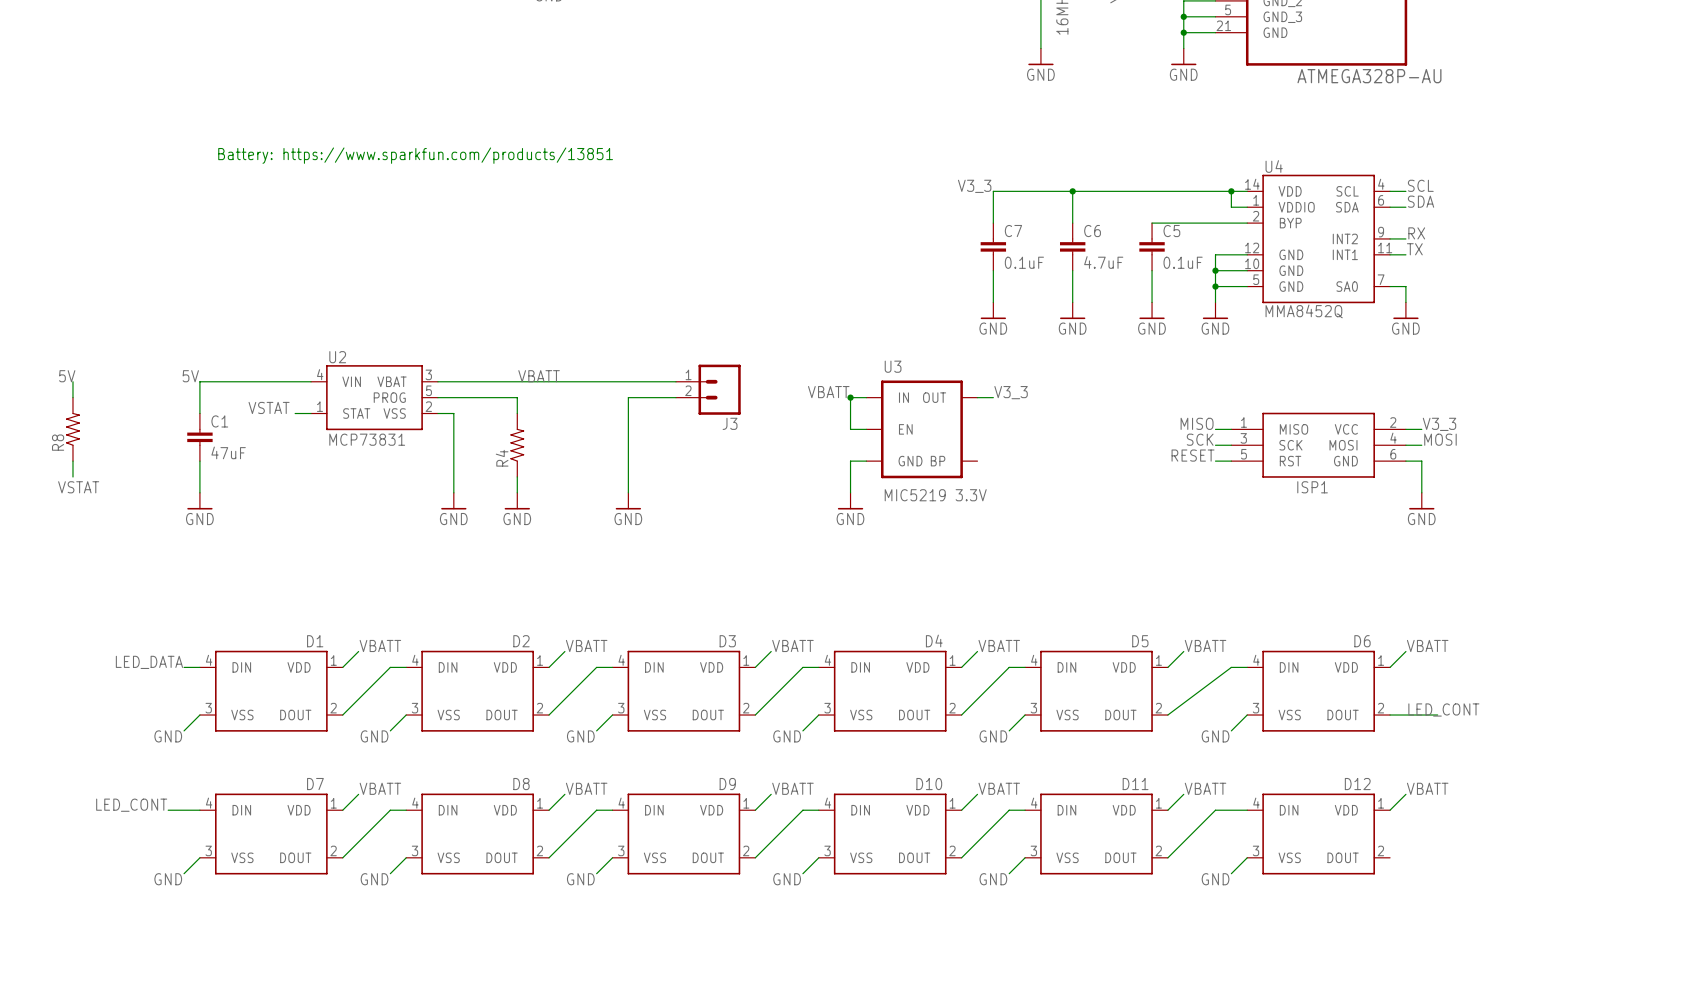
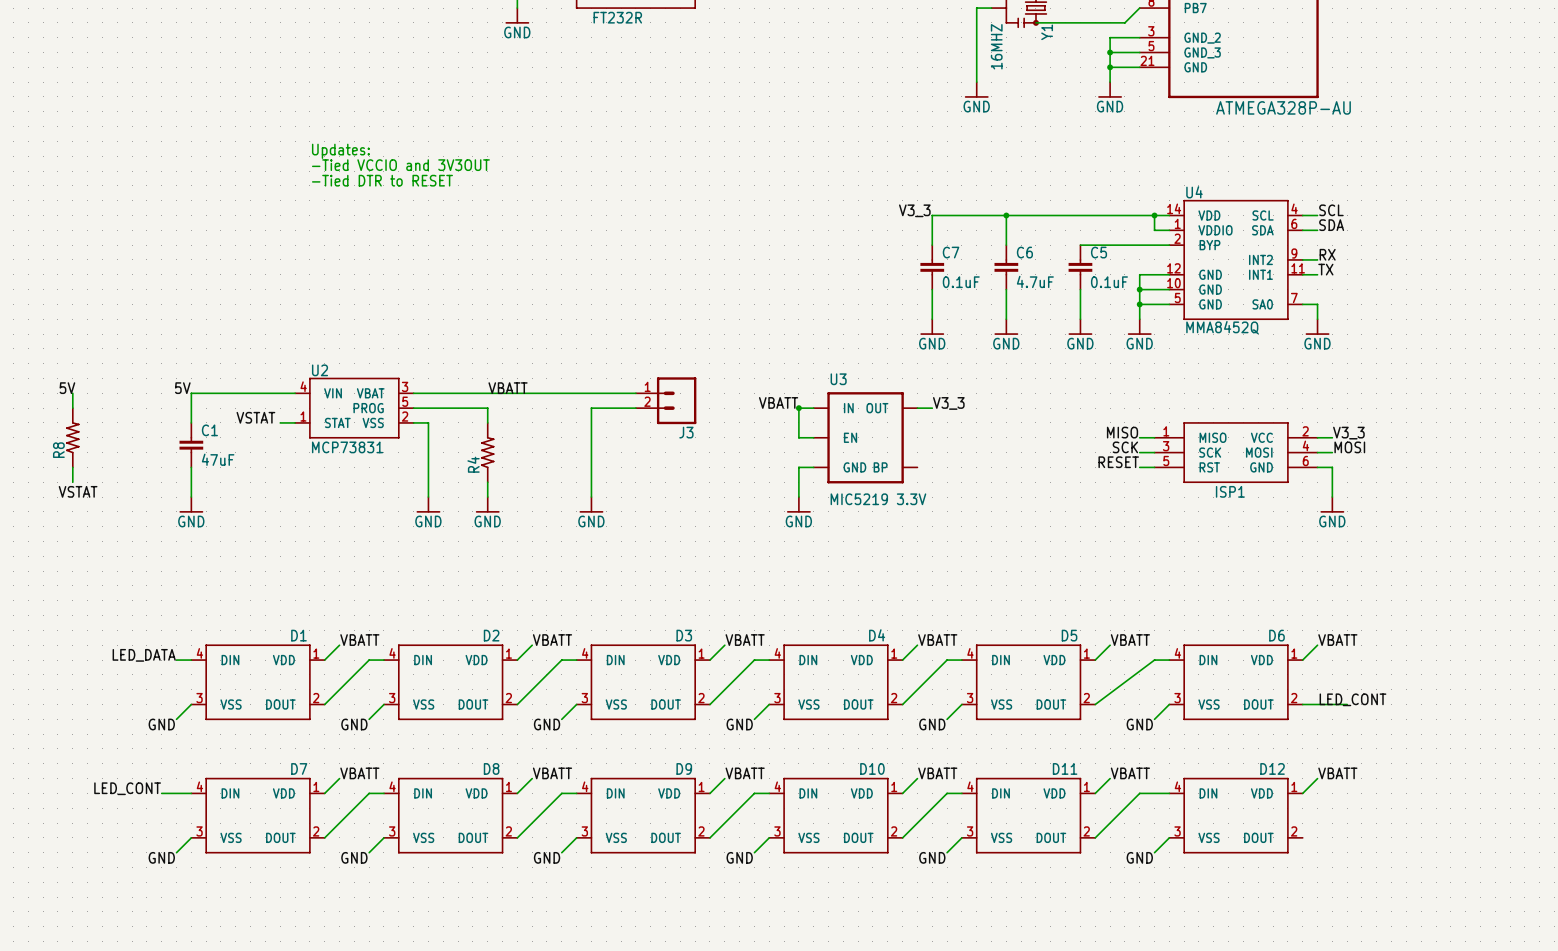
text: none -> Updates: (340, 151)
text: none -> -Tied VCCIO and 3V3OUT (400, 165)
text: none -> -Tied DTR to RESET (382, 180)
text: Battery: https://www.sparkfun.com/products/13851 (415, 155) -> none

